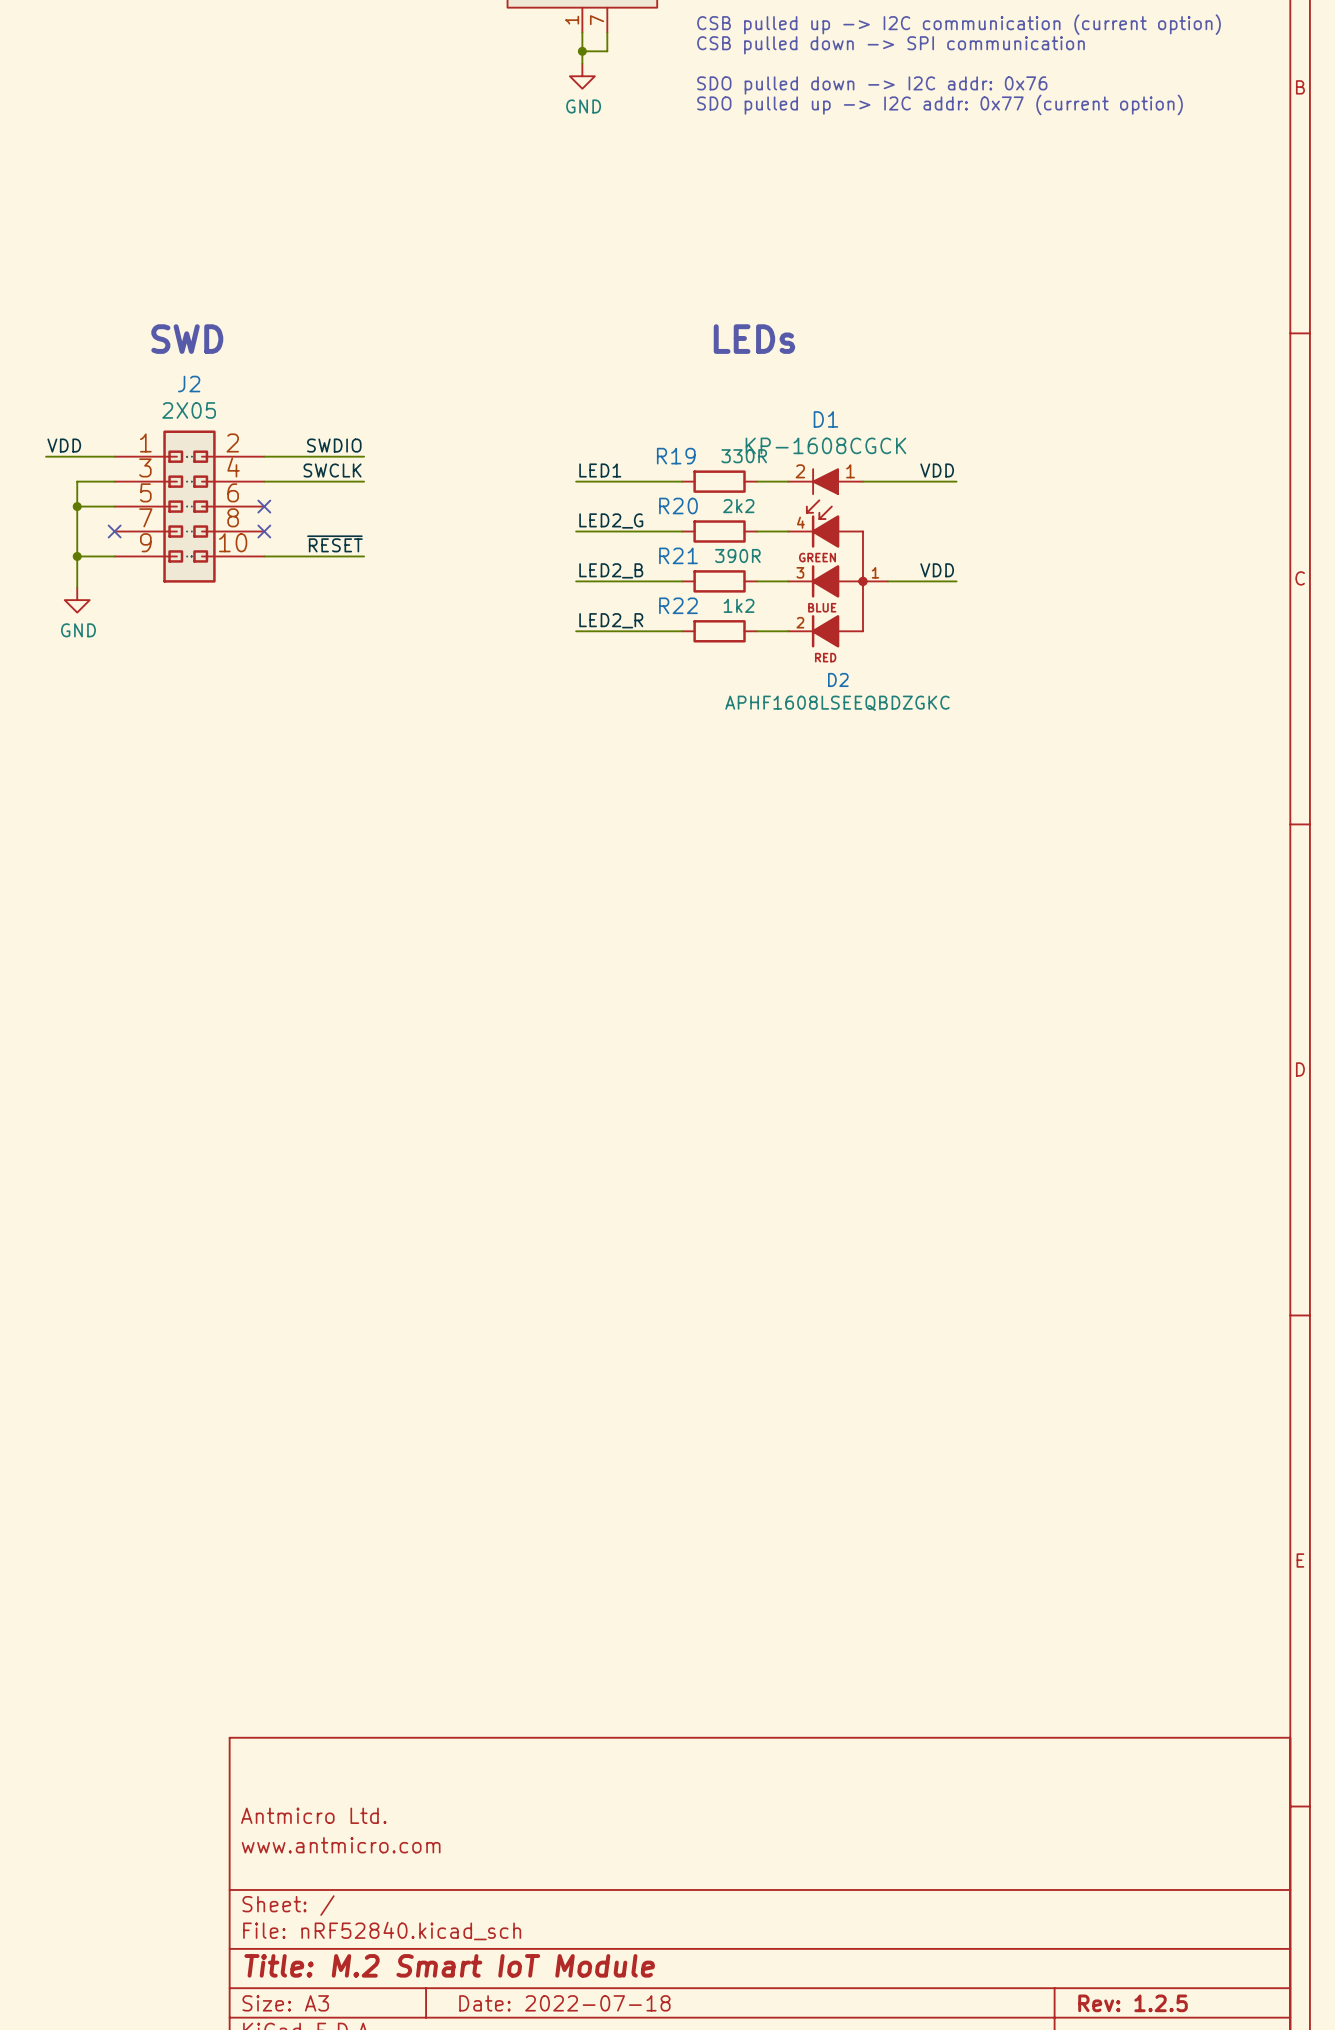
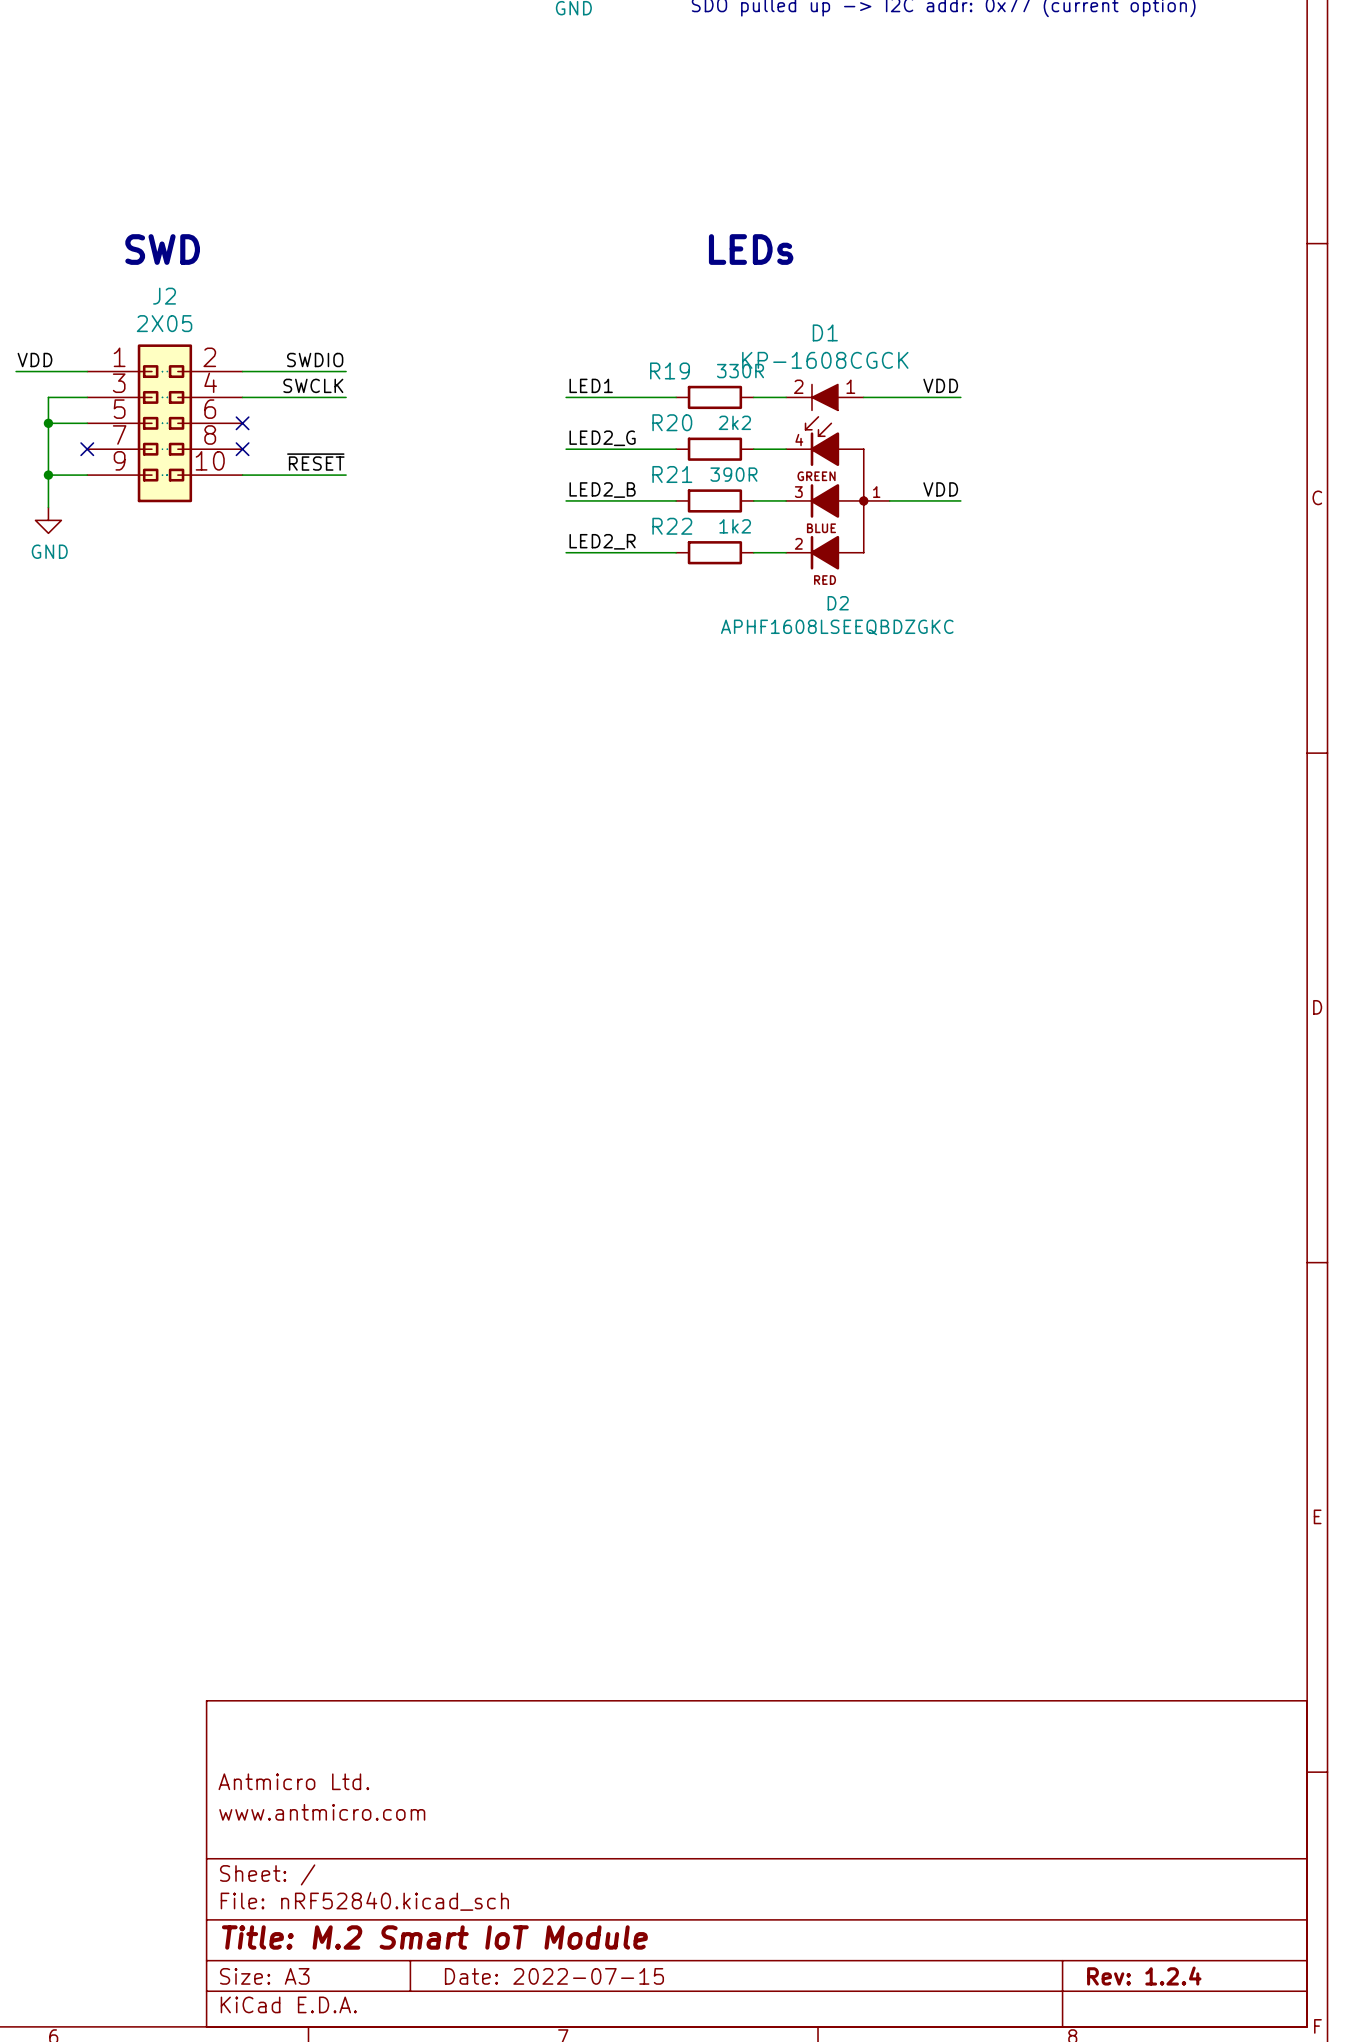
title block: Date: 2022-07-18 (564, 2003) -> Date: 2022-07-15 (554, 1976)
title block: Rev: 1.2.5 (1133, 2003) -> Rev: 1.2.4 (1144, 1976)

